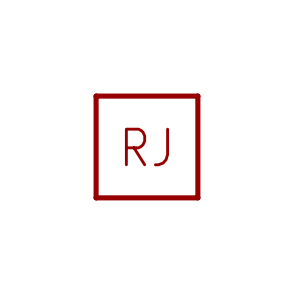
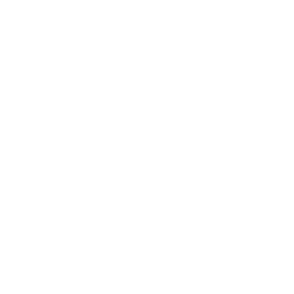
part: (146, 146) -> none

